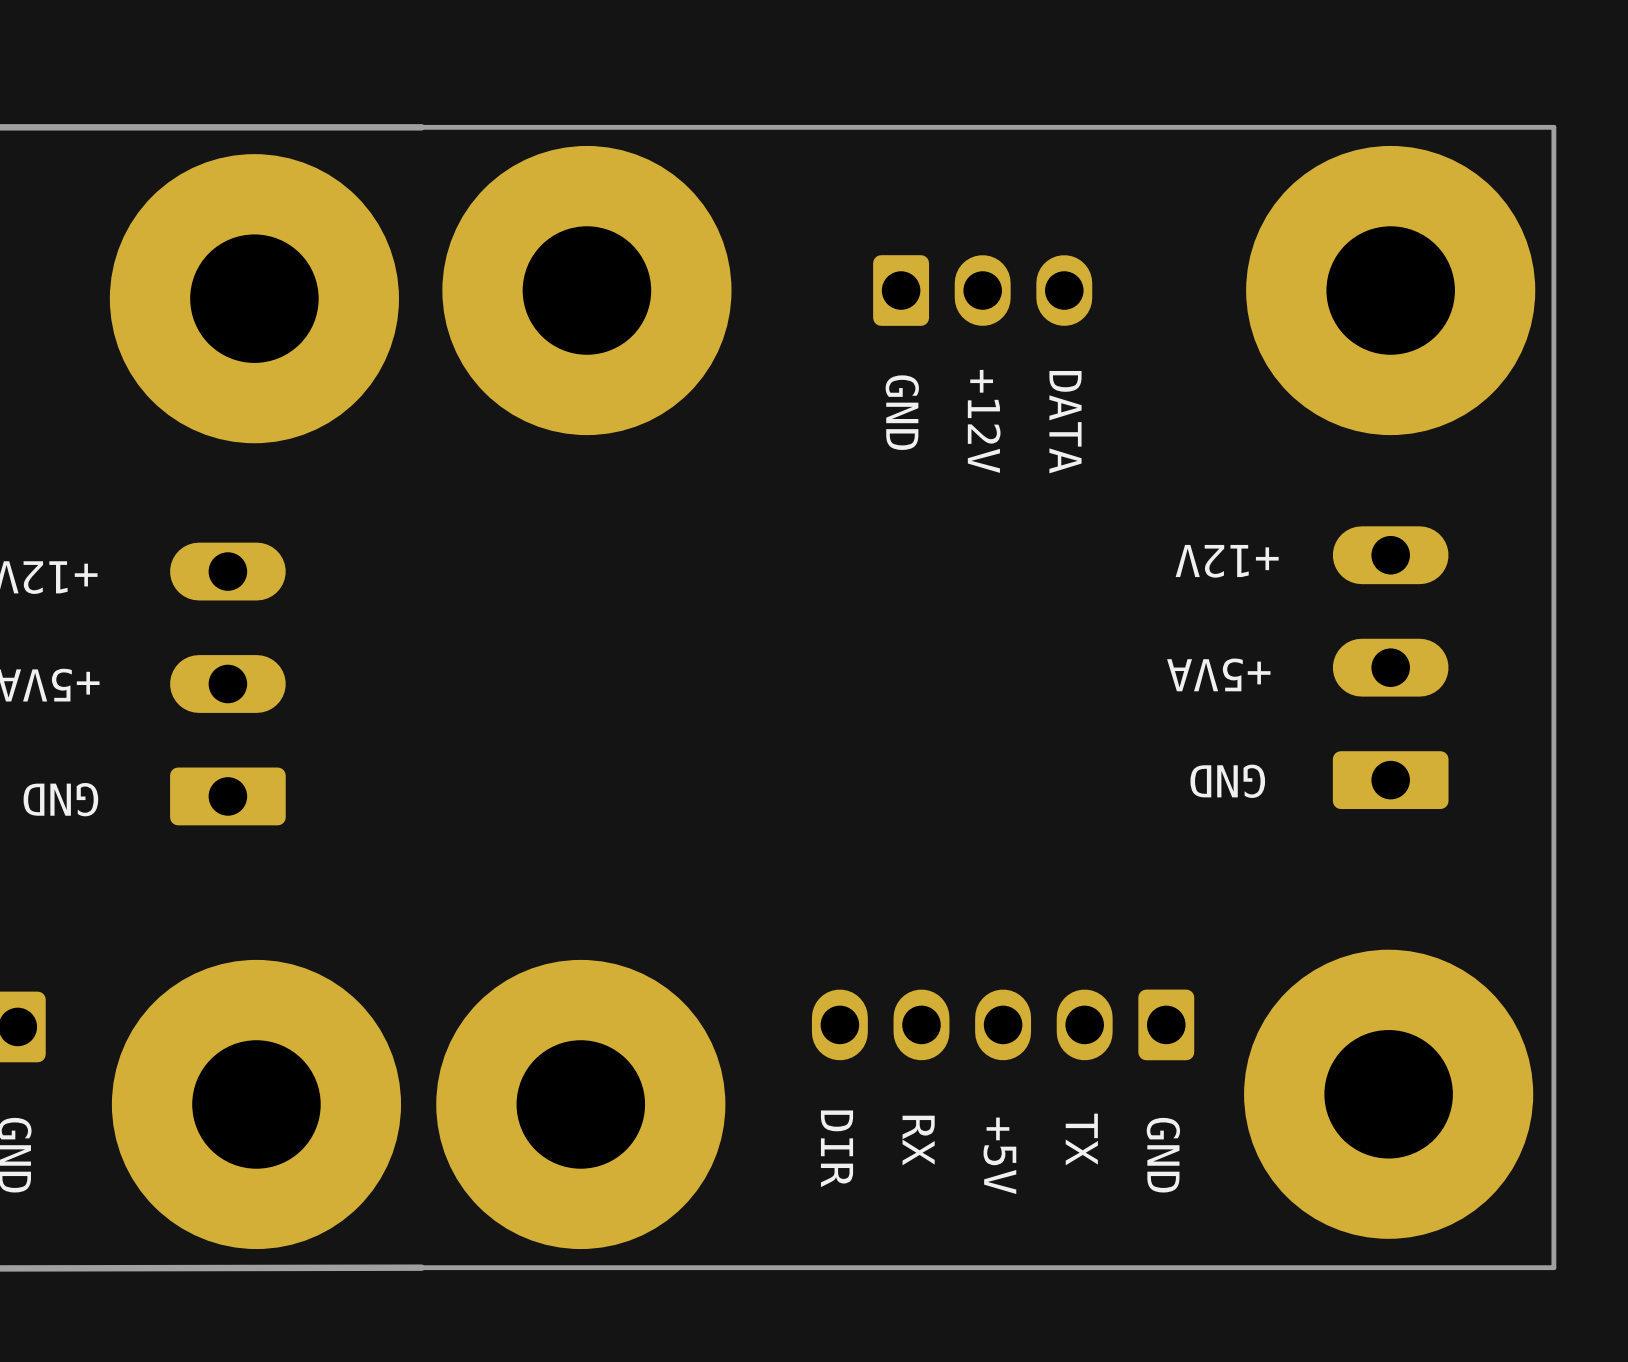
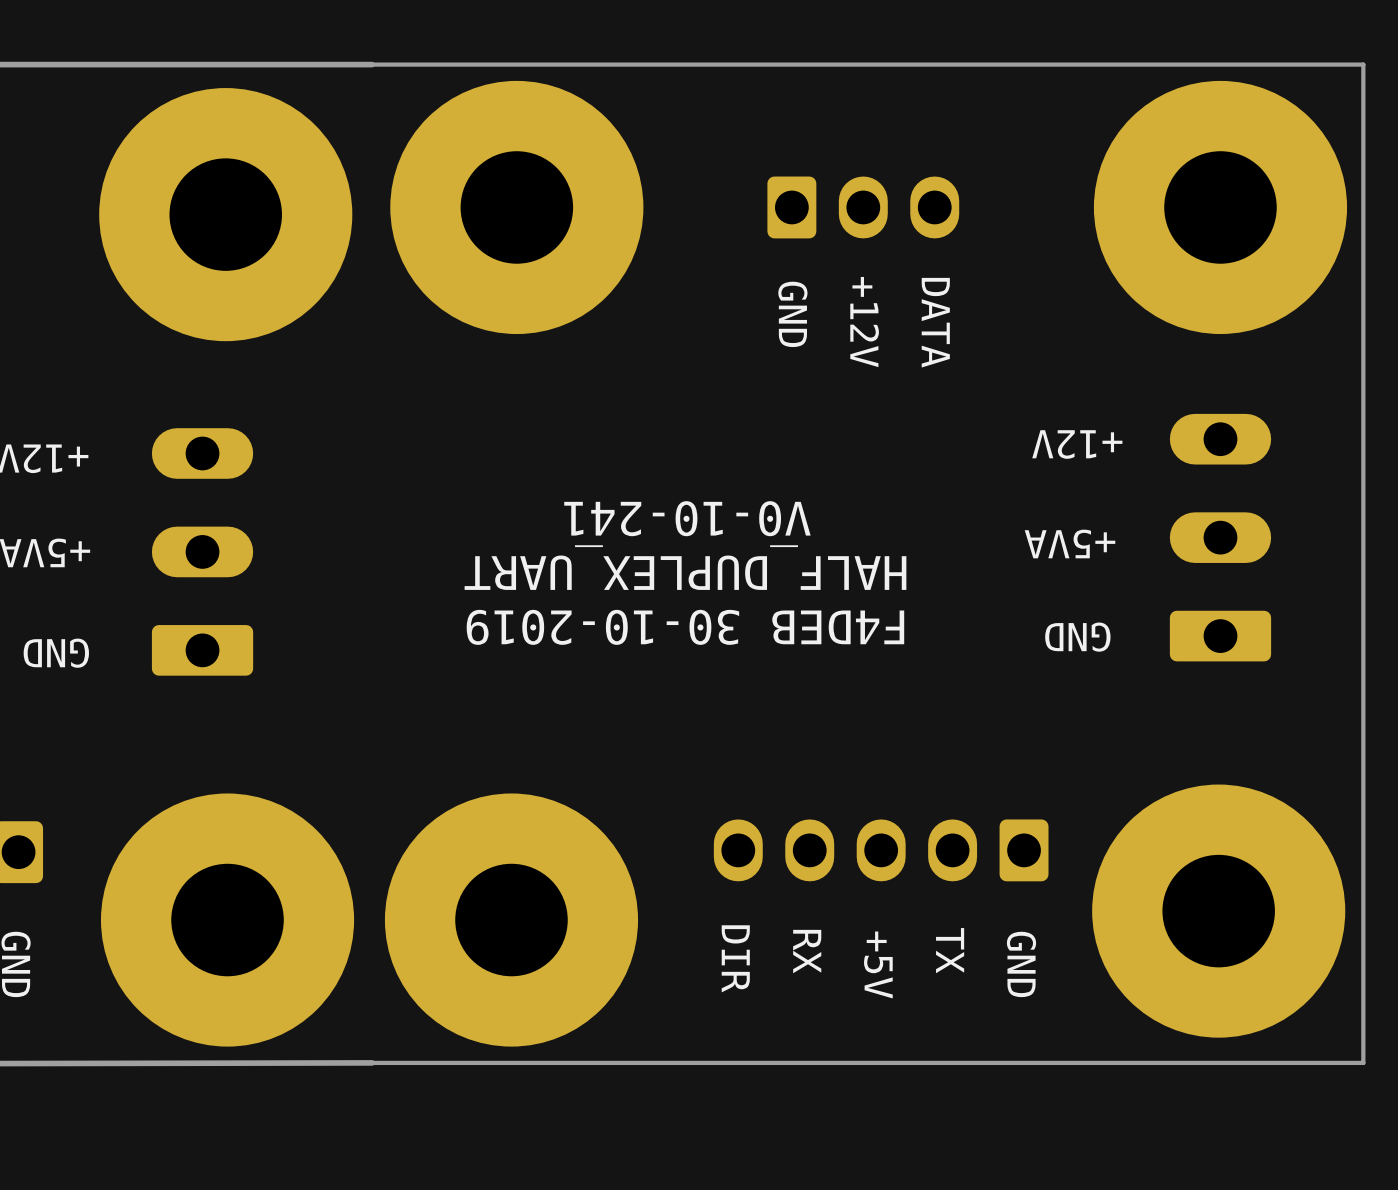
text: none -> V0-10-241 (687, 518)
text: none -> HALF_DUPLEX_UART (685, 567)
text: none -> F4DEB 30-10-2019 (685, 627)

